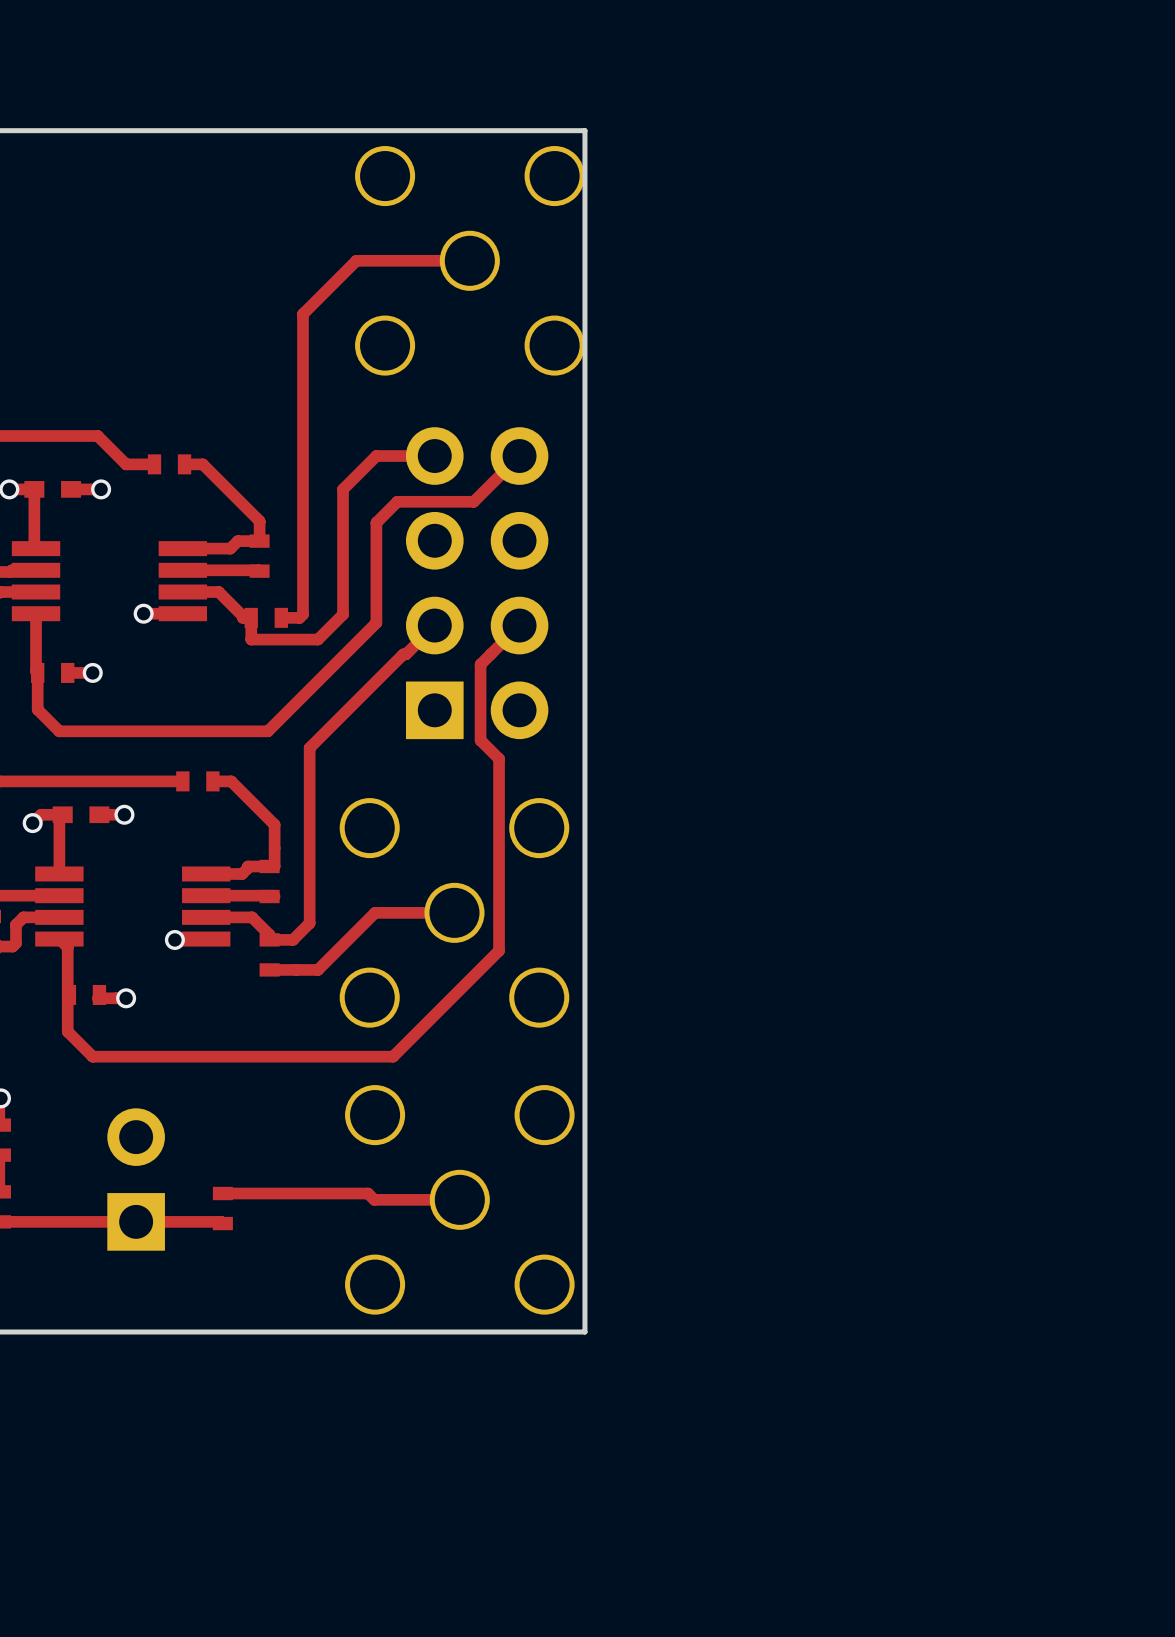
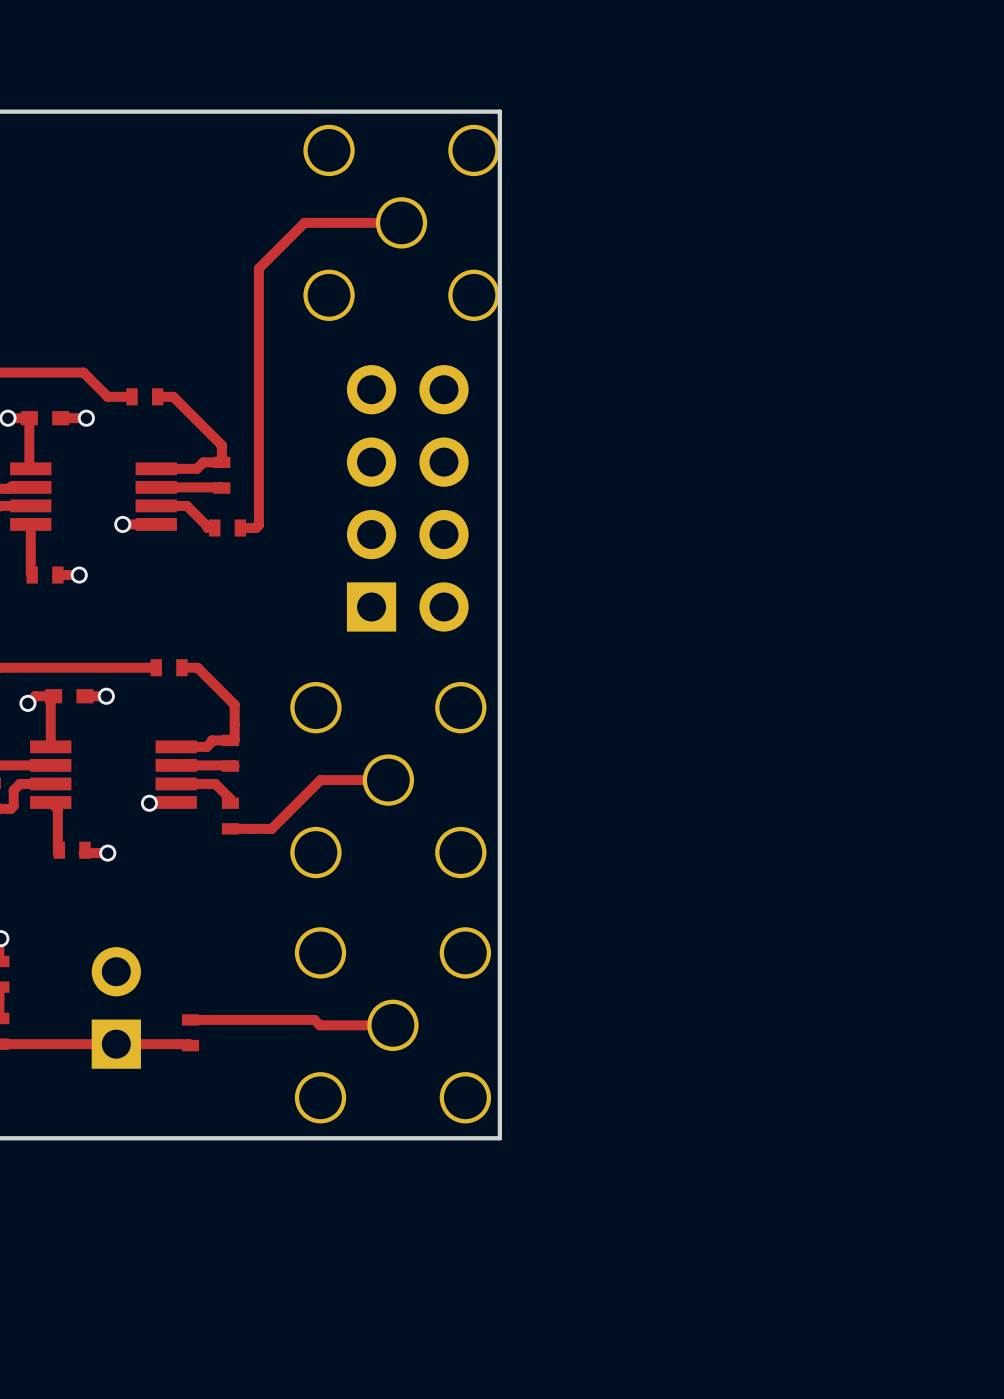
top track: (434, 456) (376, 456) (343, 489) (343, 614) (318, 639) (251, 639) (251, 617) -> none
top track: (519, 456) (473, 501) (397, 501) (376, 522) (376, 622) (267, 731) (59, 731) (37, 709) (37, 672) -> none
top track: (434, 625) (309, 748) (309, 923) (292, 939) (269, 939) -> none
top track: (519, 625) (480, 664) (480, 740) (499, 758) (499, 950) (393, 1056) (92, 1056) (67, 1031) (69, 994) -> none

